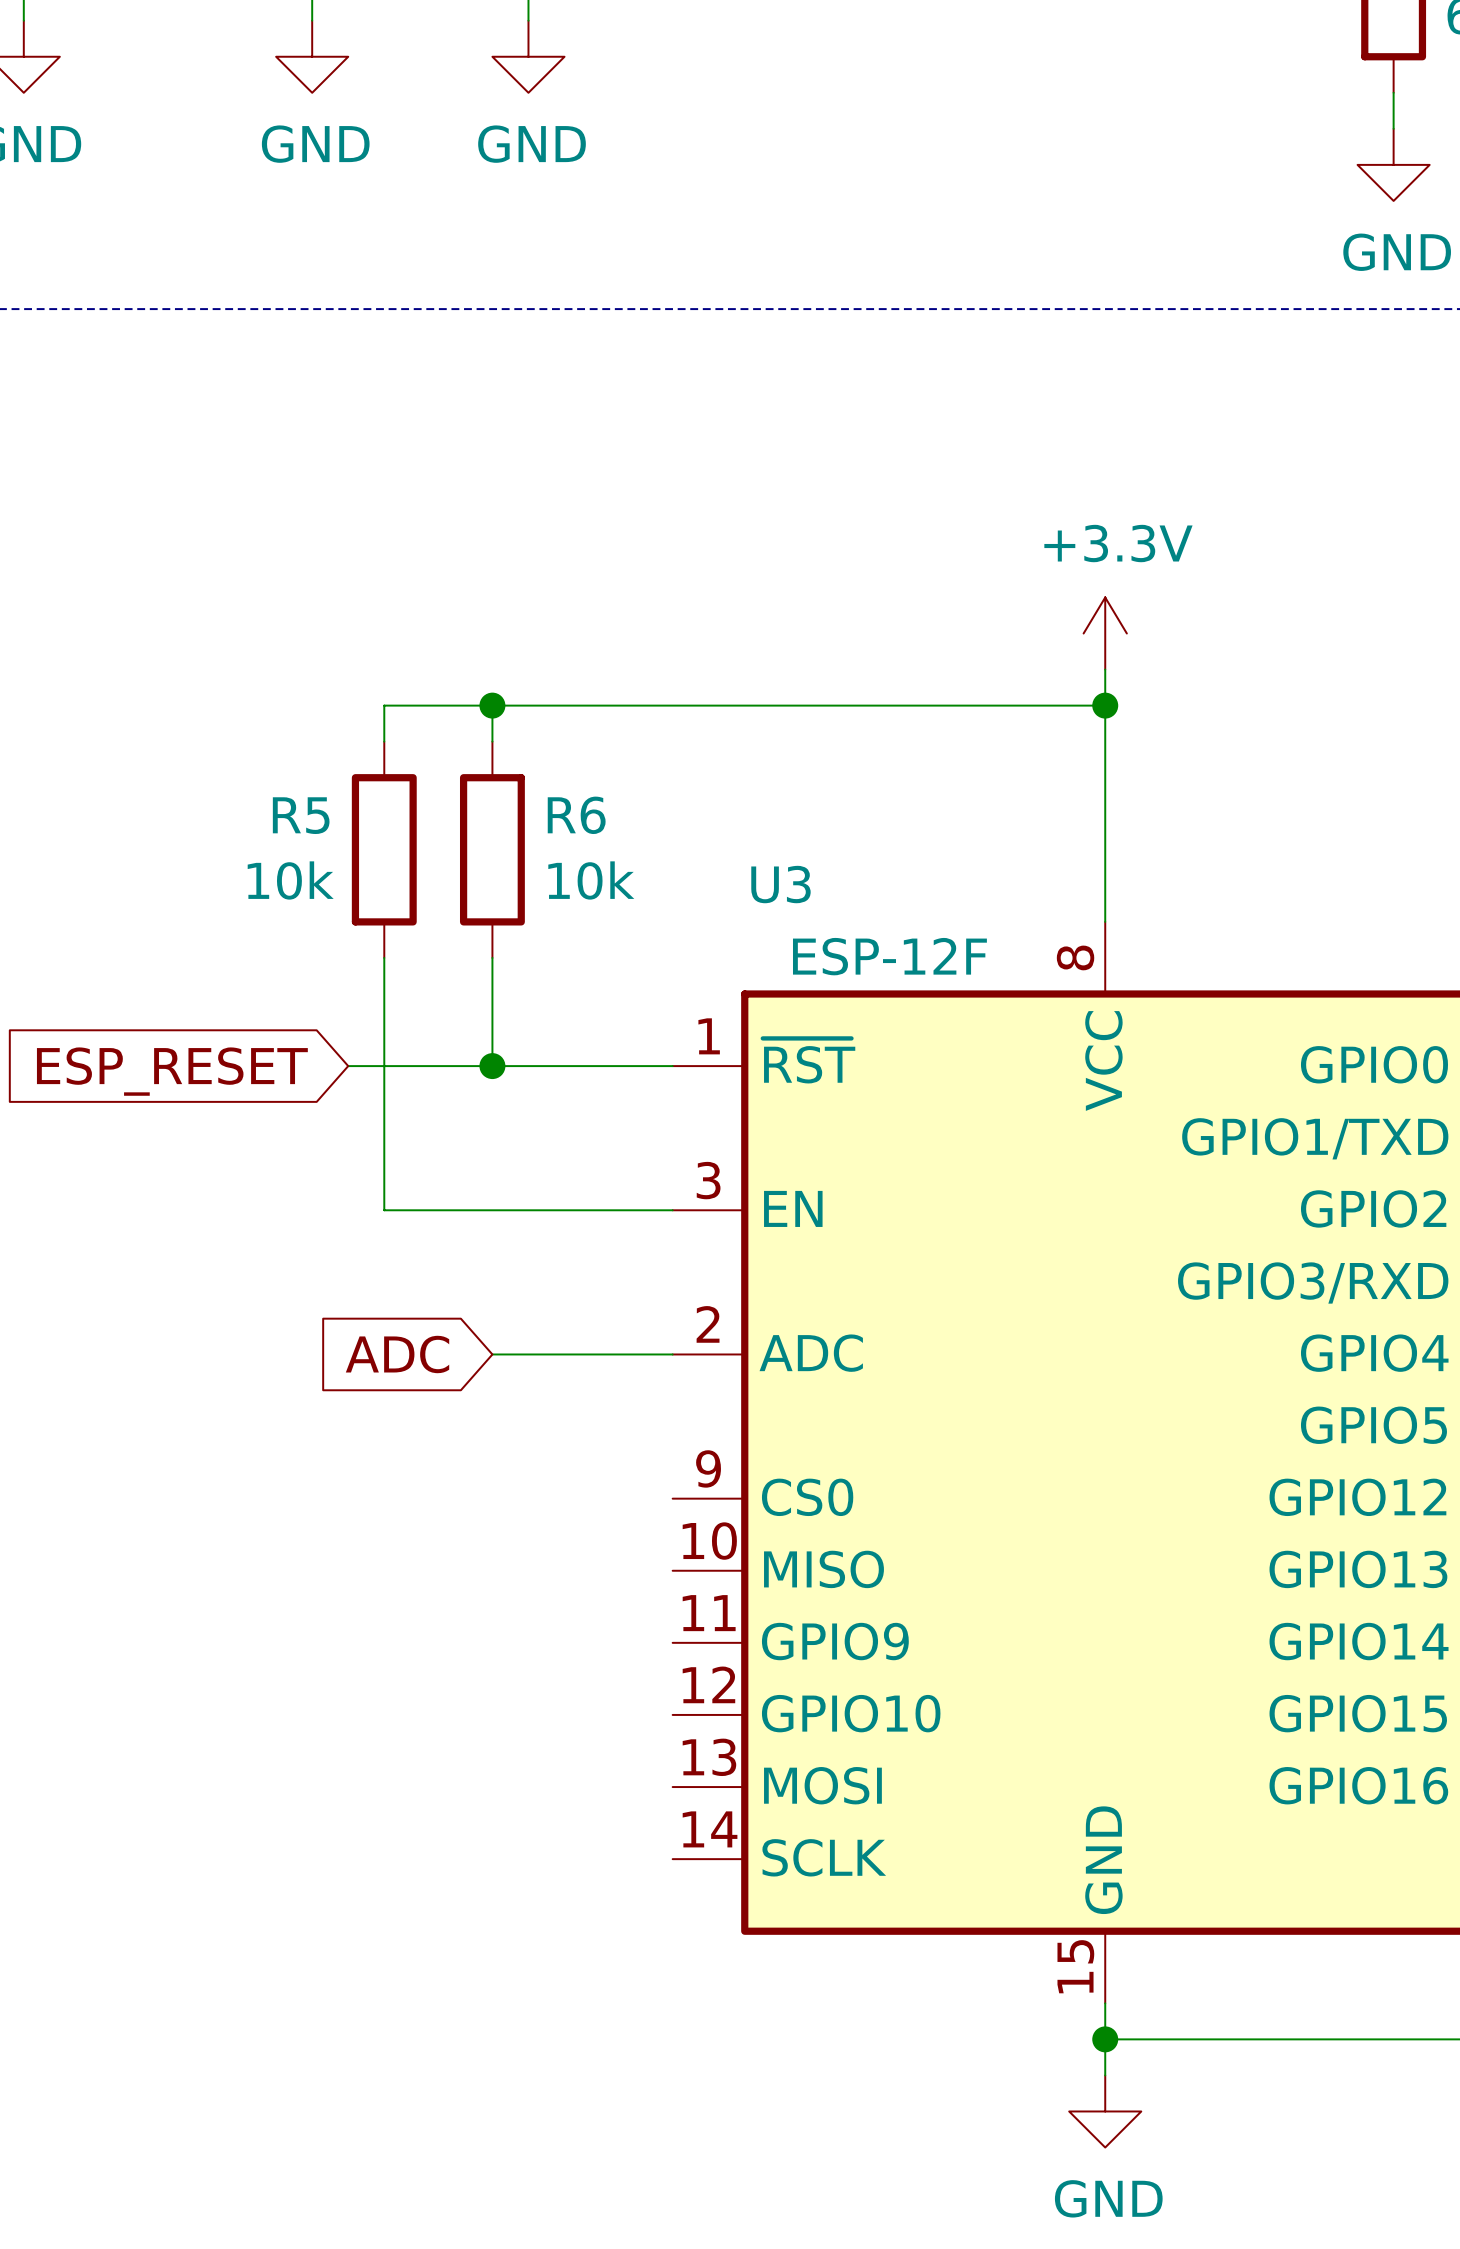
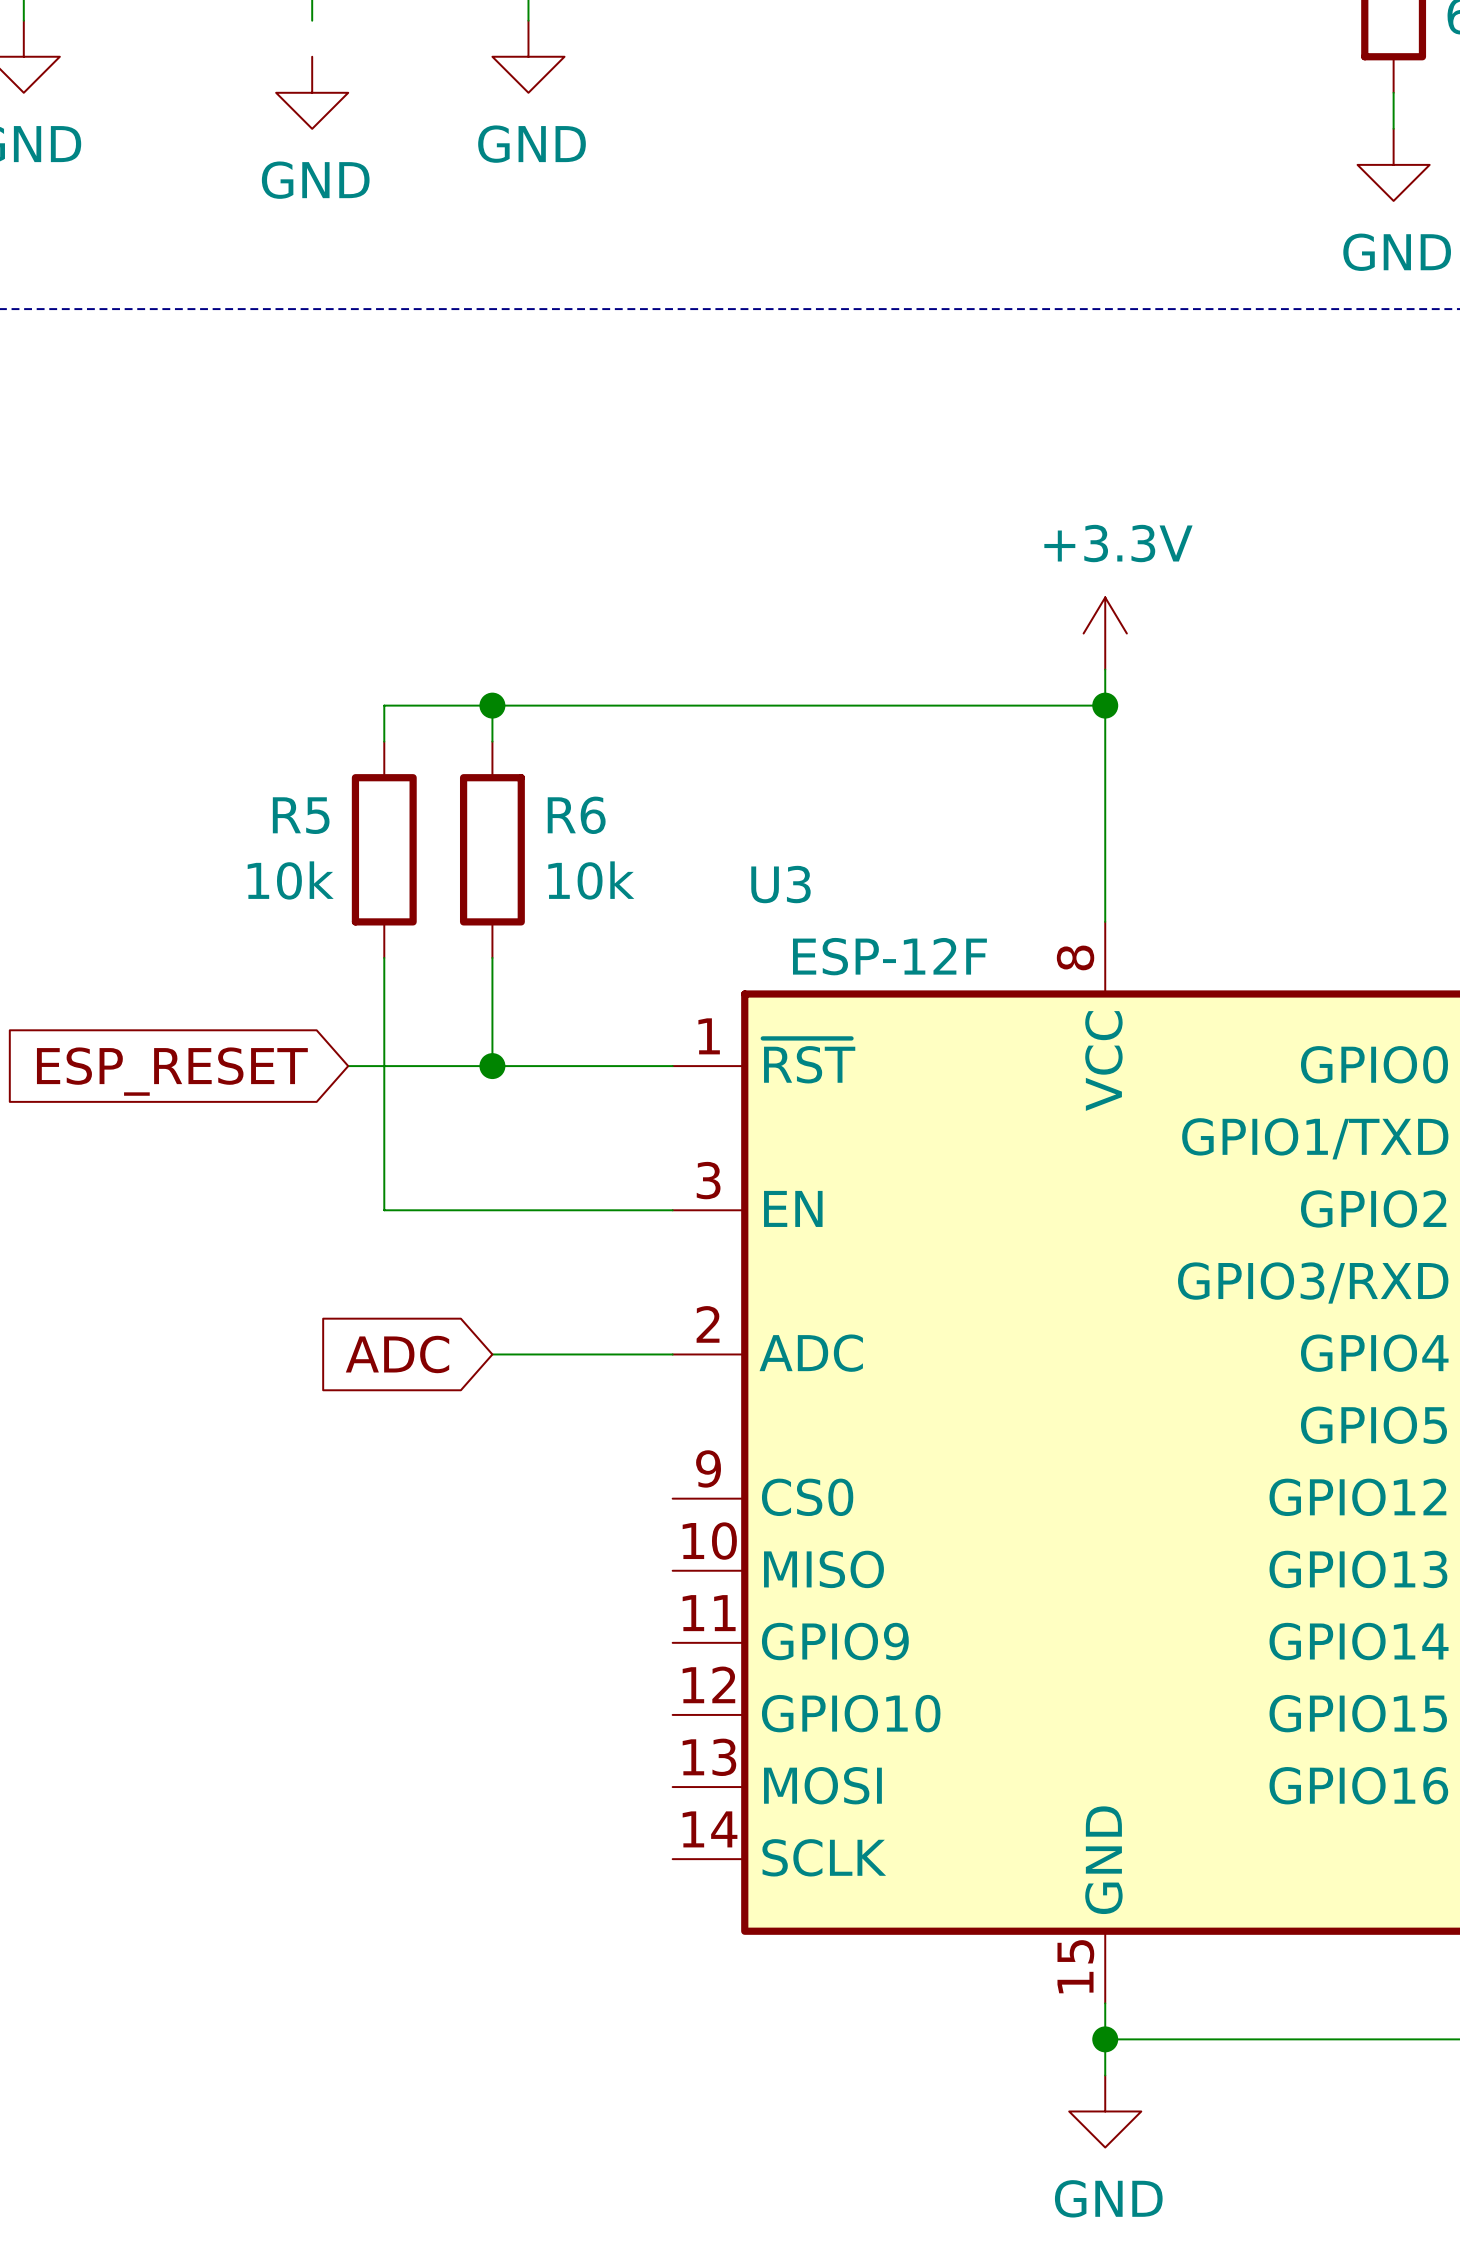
power symbol position: GND (312, 56) -> GND (312, 92)

